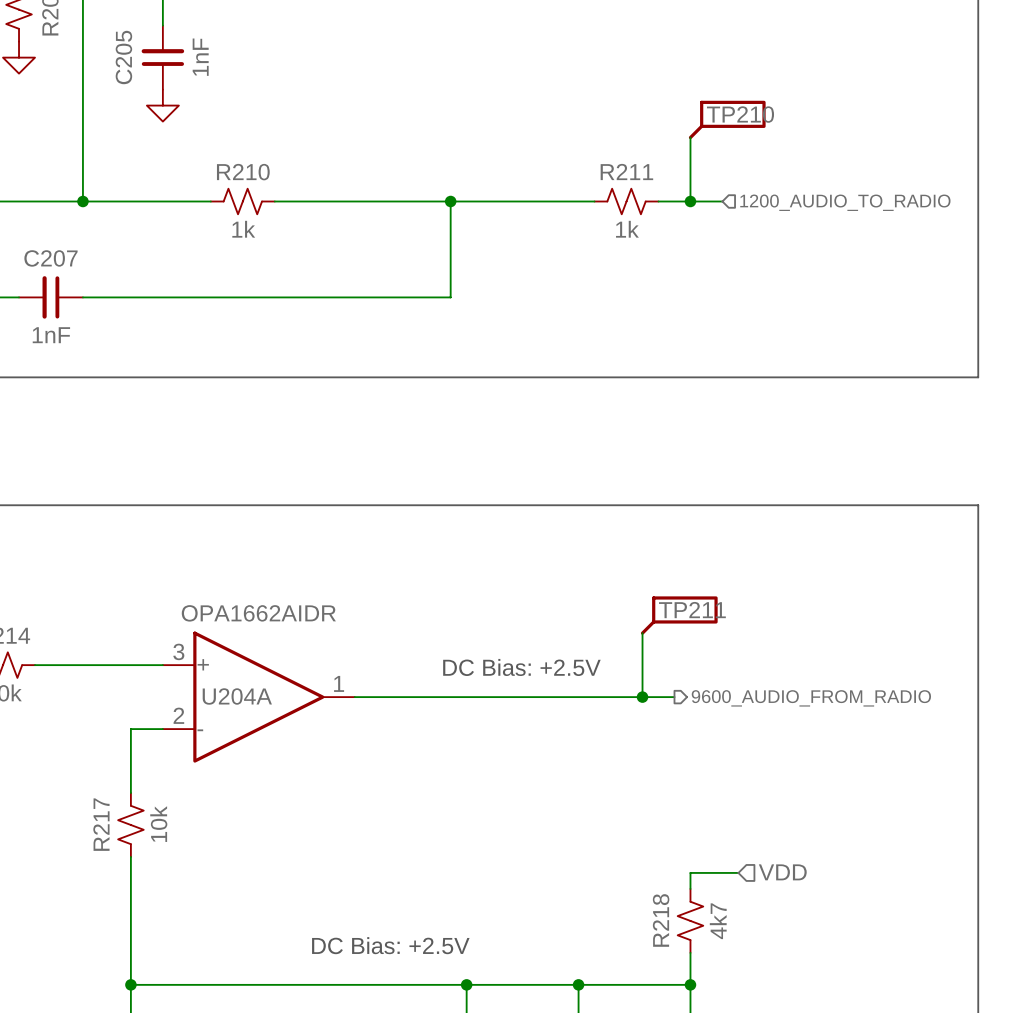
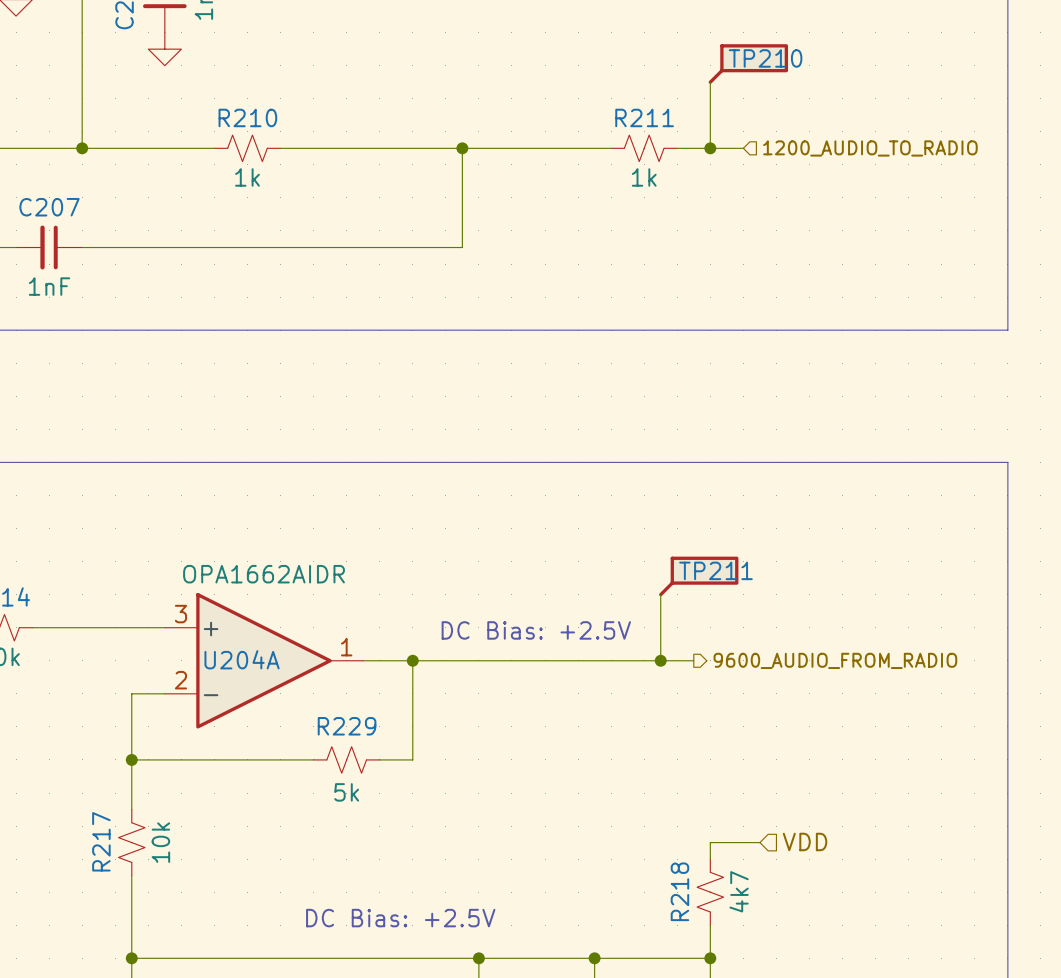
wire: none -> (412, 660) (412, 759) (379, 759)
junction: none -> (412, 660)
junction: none -> (131, 759)
wire: none -> (313, 759) (131, 759) (131, 809)
R229: none -> 5k (346, 759)
R217 position: (130, 825) -> (131, 842)
wire: (130, 856) (130, 904) -> none

